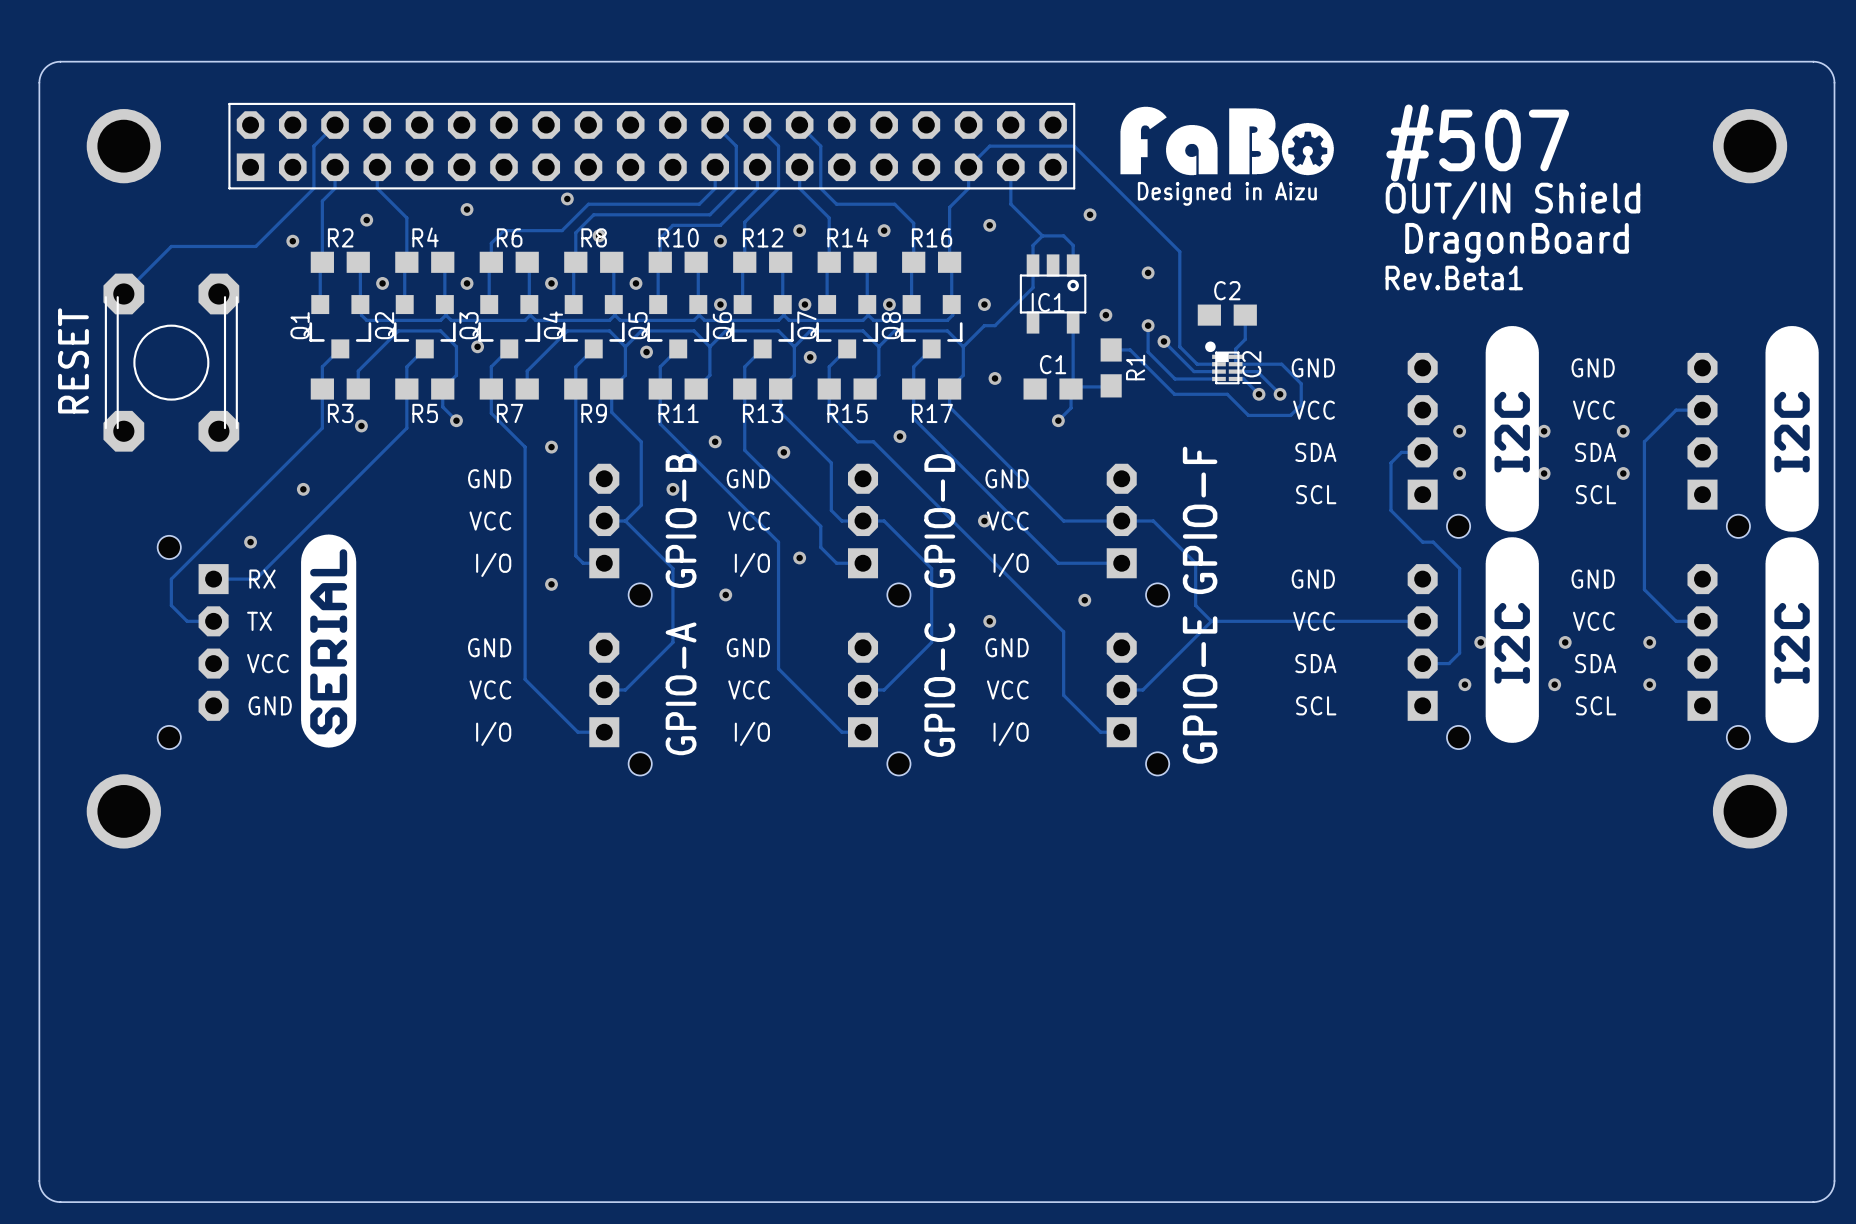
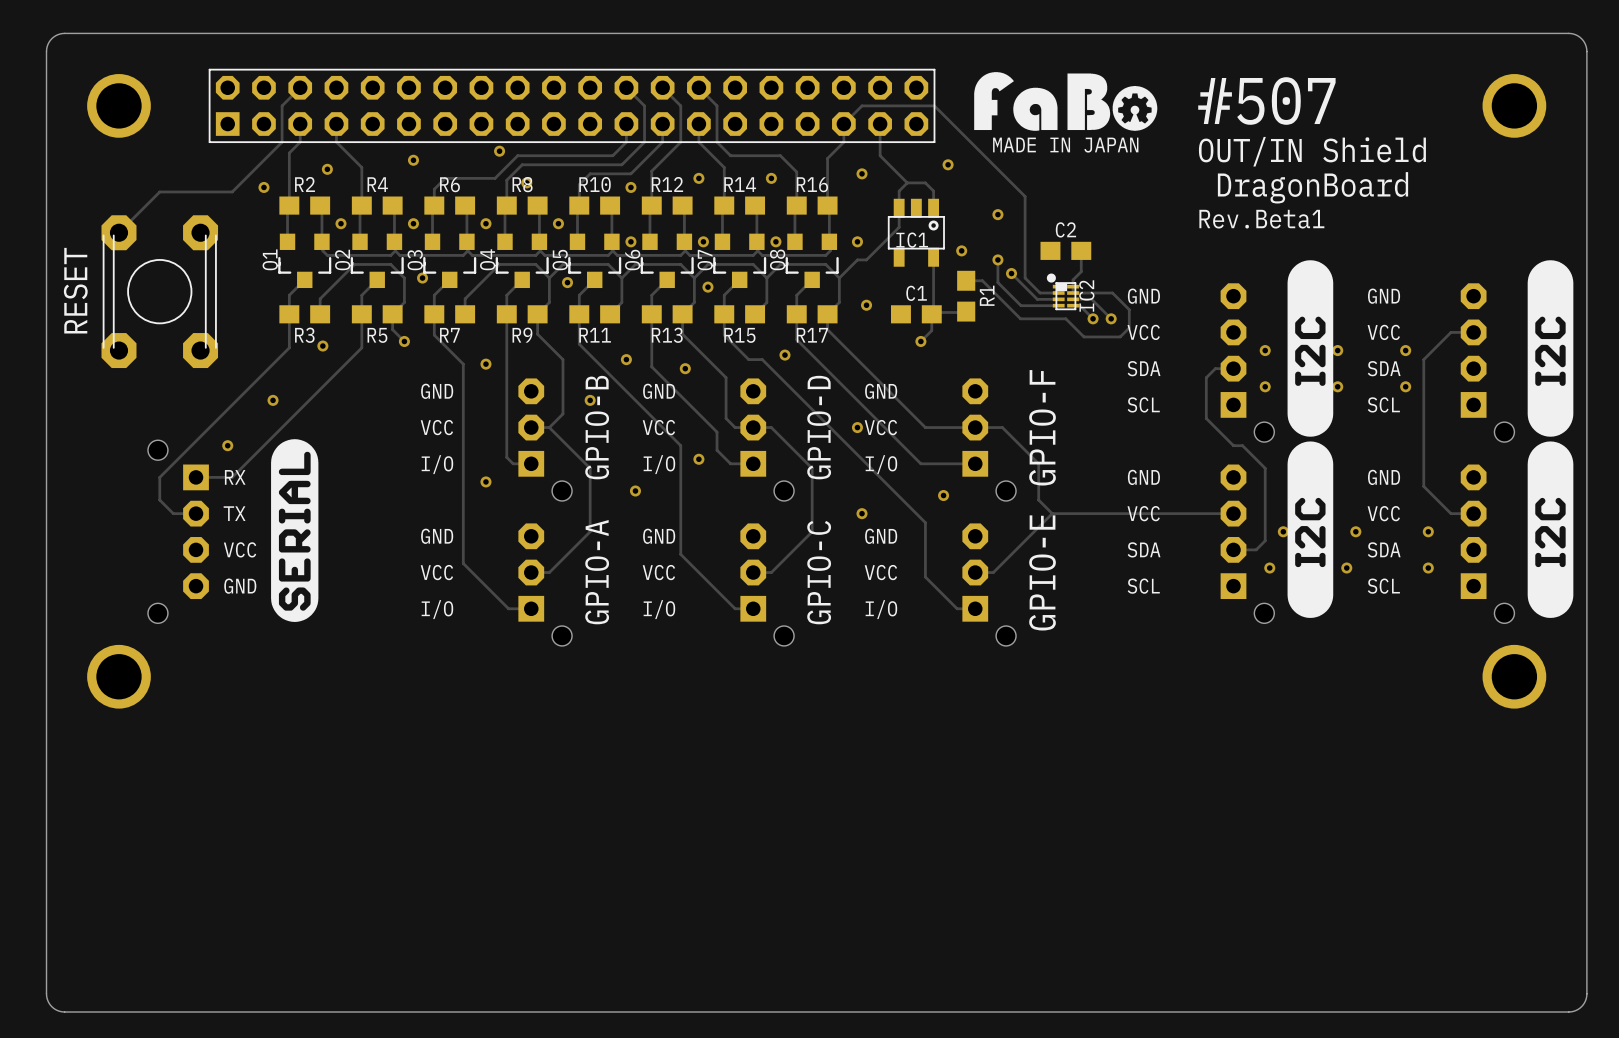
text: Designed in Aizu (1227, 193) -> MADE IN JAPAN (1065, 145)

